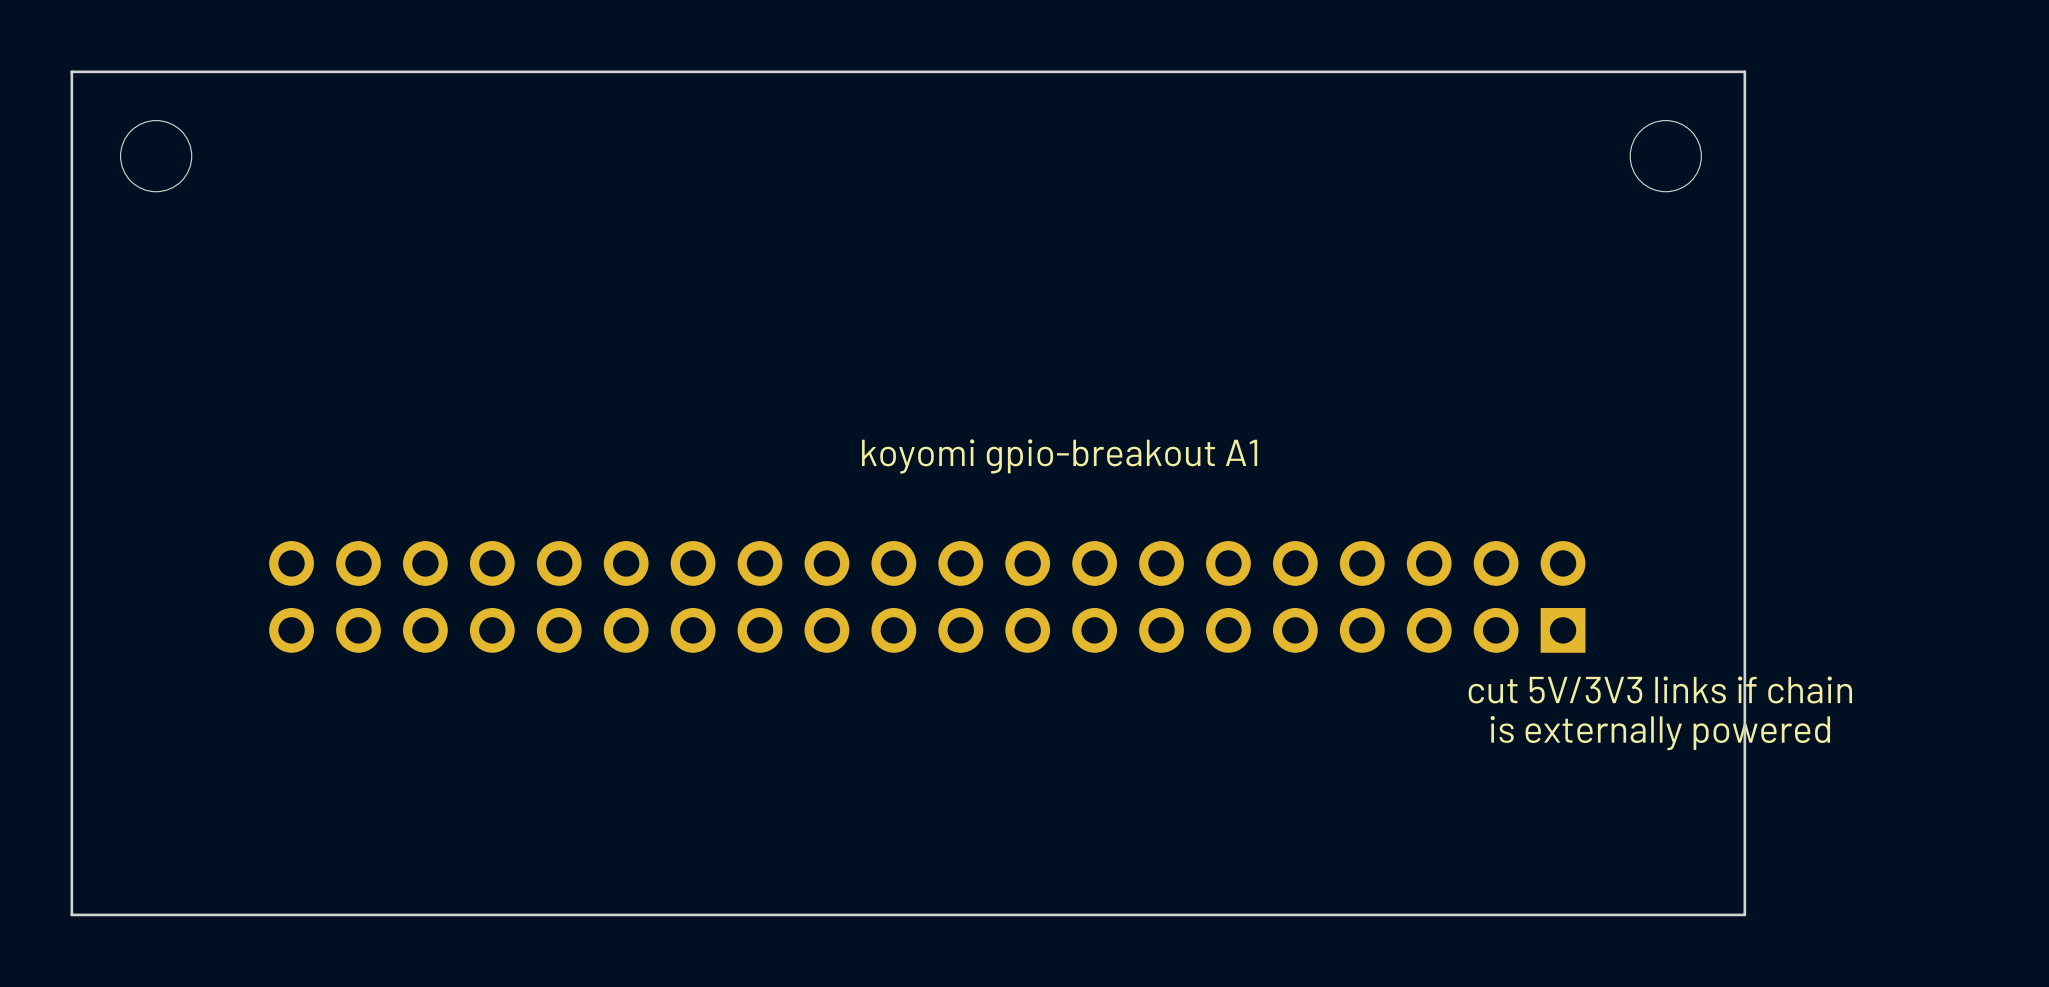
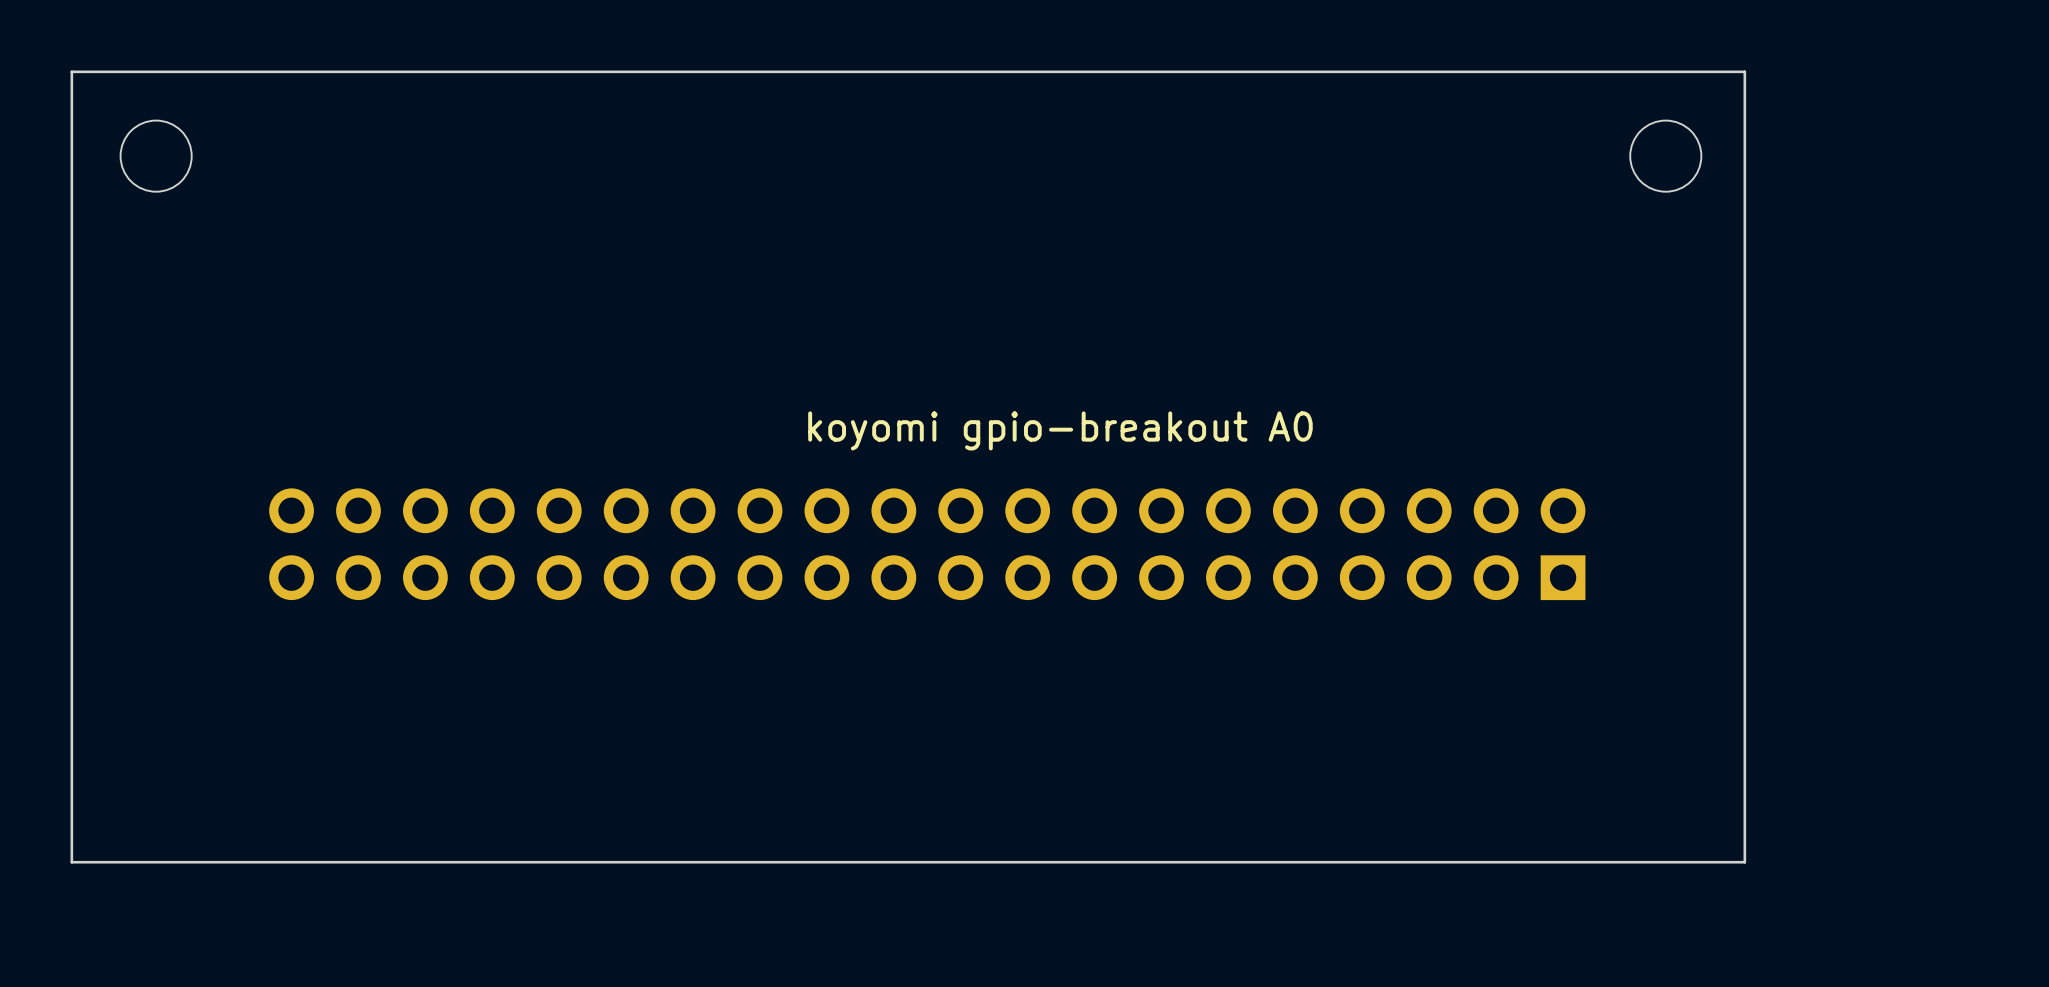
text: koyomi gpio-breakout A1 (1059, 456) -> koyomi gpio-breakout A0 (1060, 430)
part position: (927, 596) -> (927, 544)
text: cut 5V/3V3 links if chain (1660, 689) -> none
text: is externally powered (1660, 733) -> none
board edge: (1744, 862) (1744, 914) (71, 914) (71, 862) -> (1744, 862) (71, 862)

